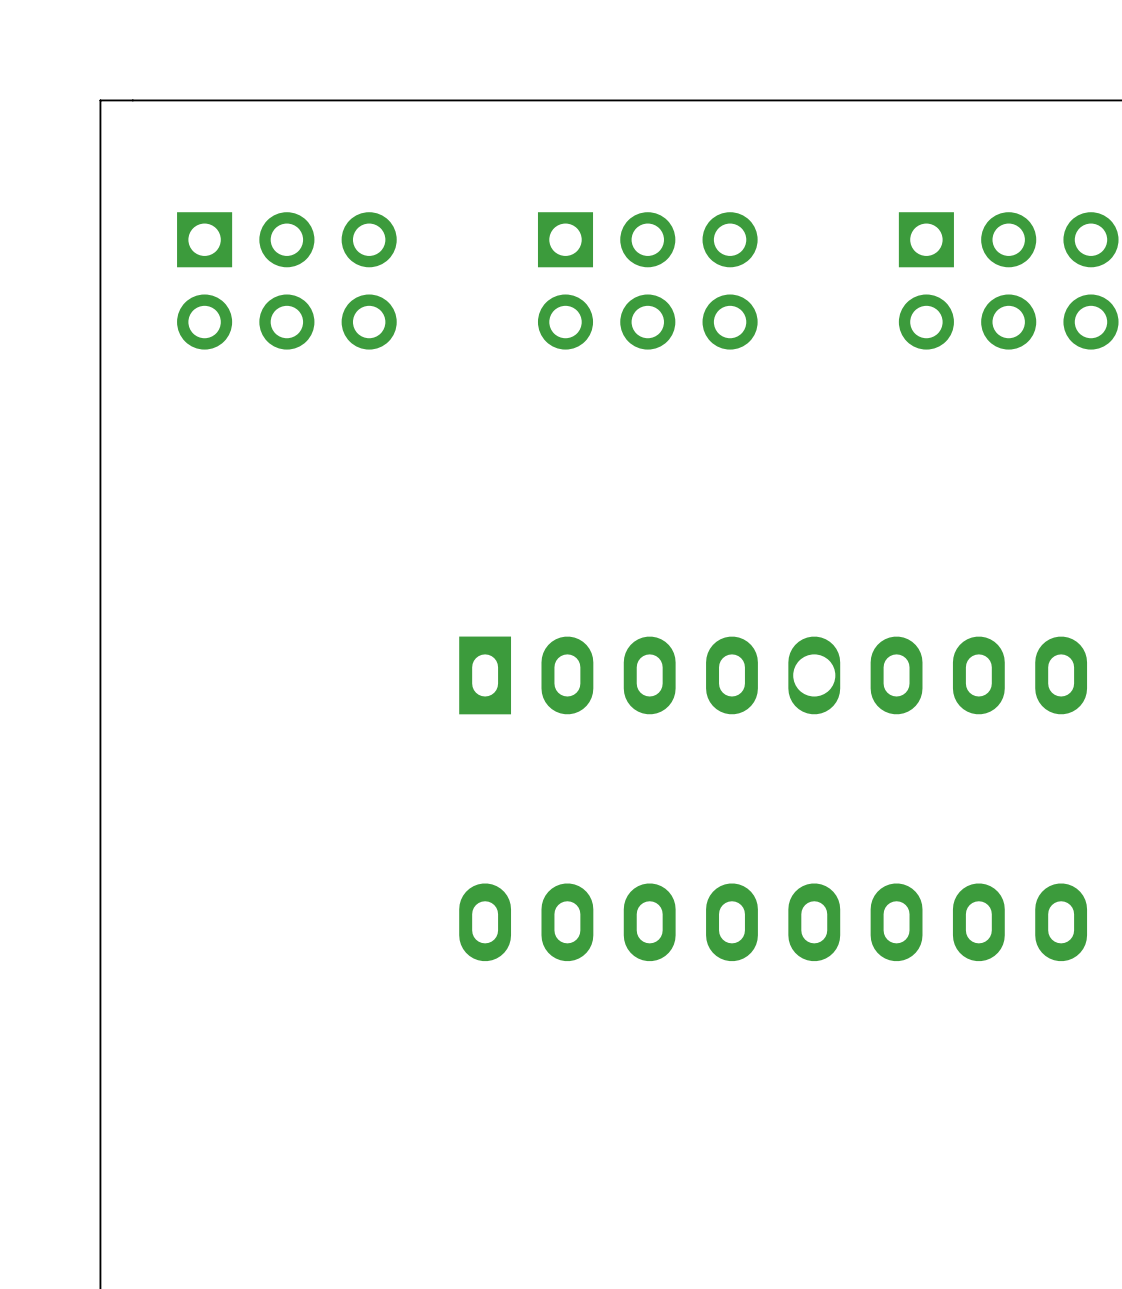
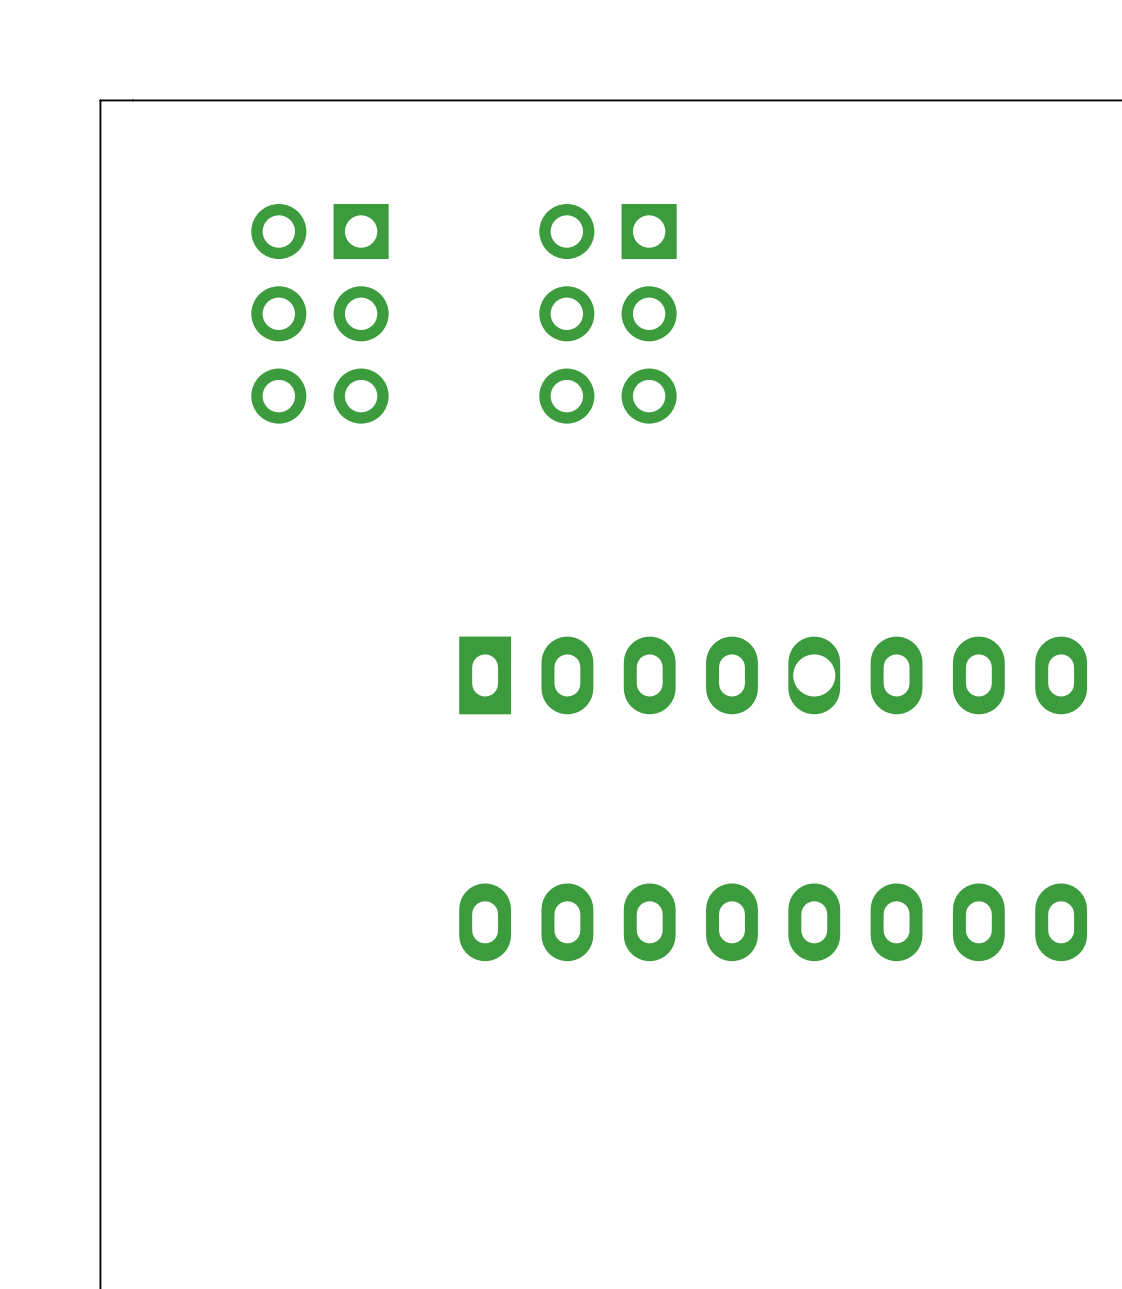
part rotation: 0° (286, 280) -> 90° clockwise (319, 313)
part rotation: 0° (647, 280) -> 90° clockwise (607, 313)
part: (1008, 280) -> none

